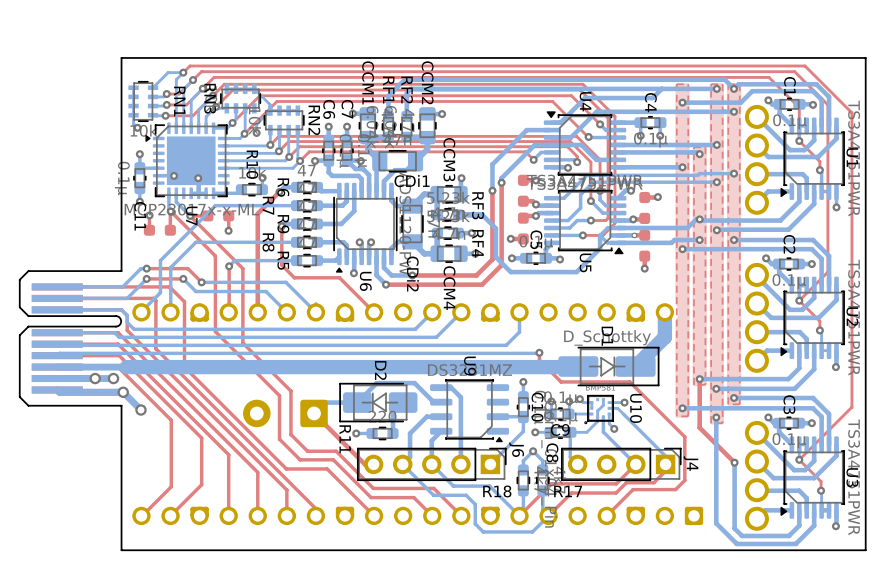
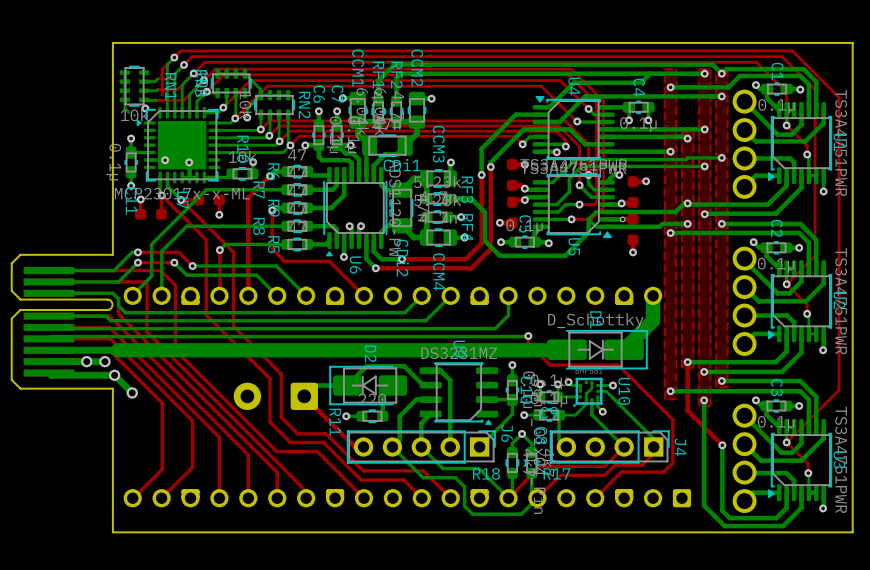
top track: none -> (174, 57) (162, 69) (162, 95)
bottom track: (183, 72) (168, 72) (153, 87) -> none
via: (166, 94) -> none
via: (166, 104) -> none
via: (165, 115) -> none
via: none -> (145, 108)
via: (137, 127) -> none

